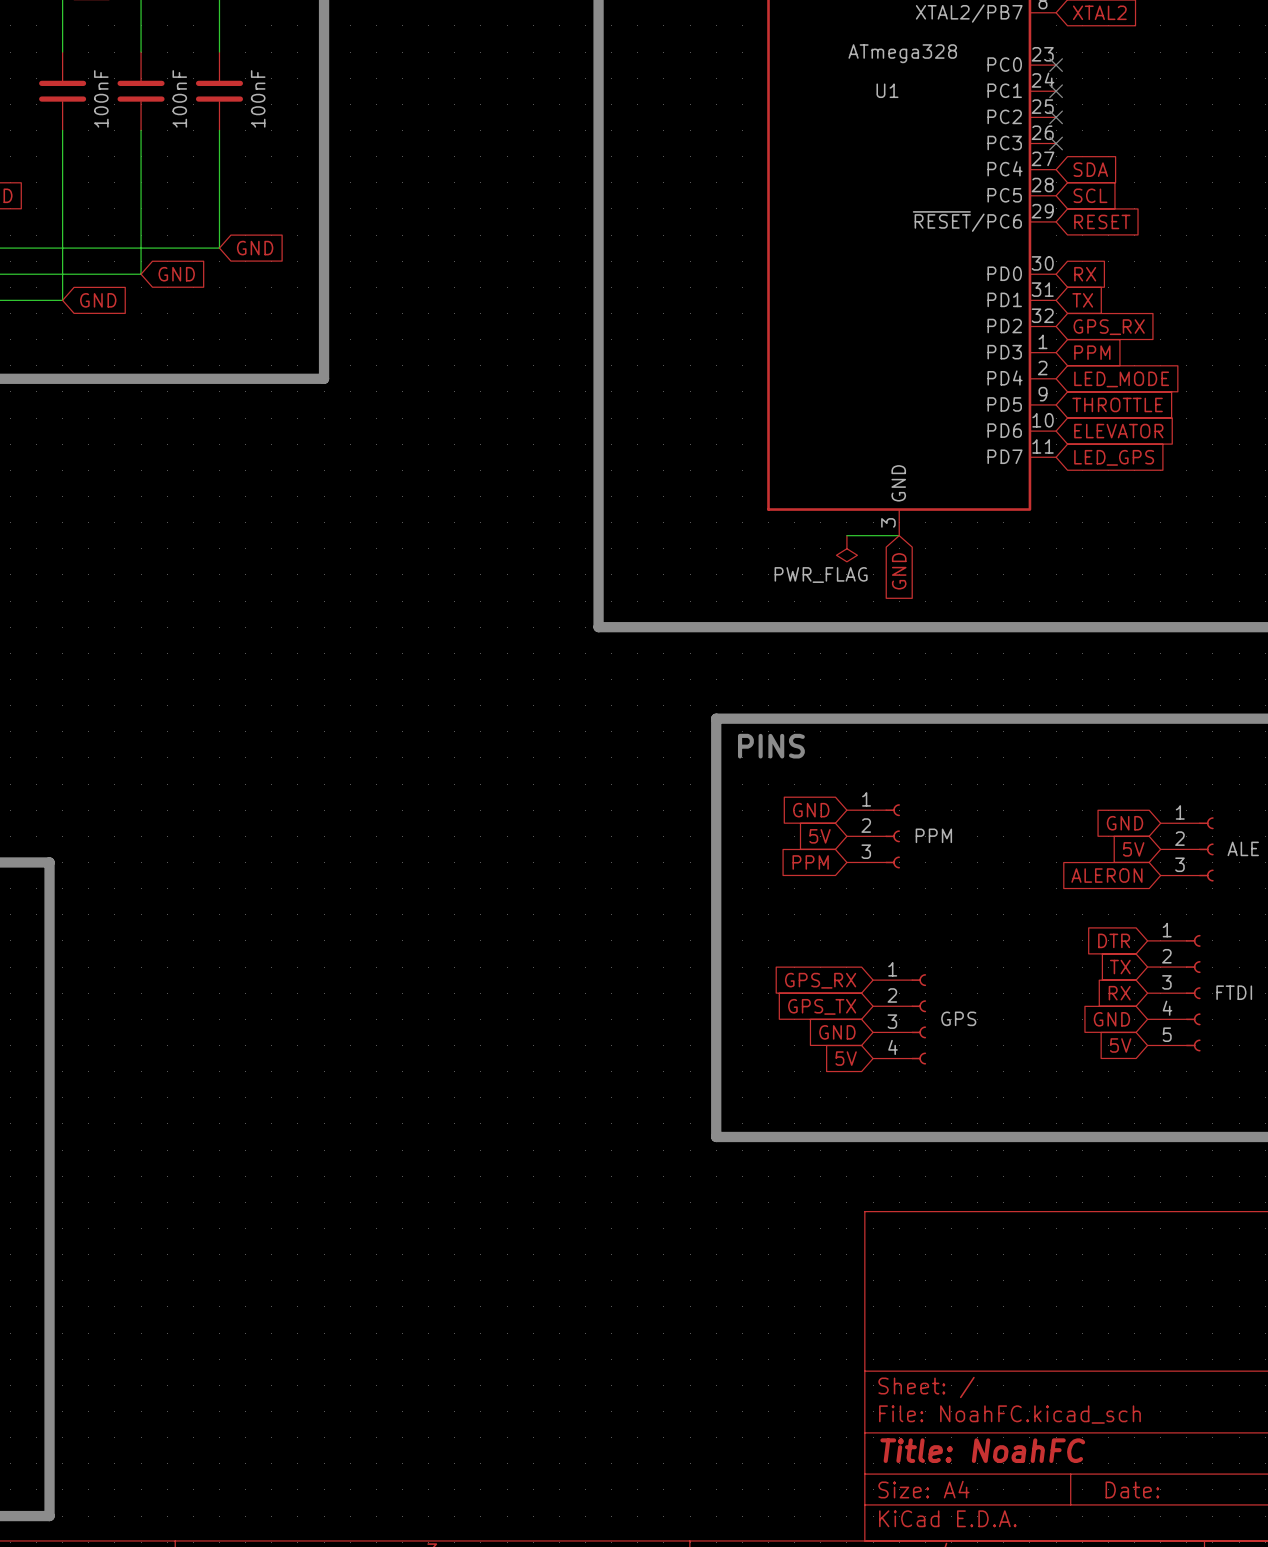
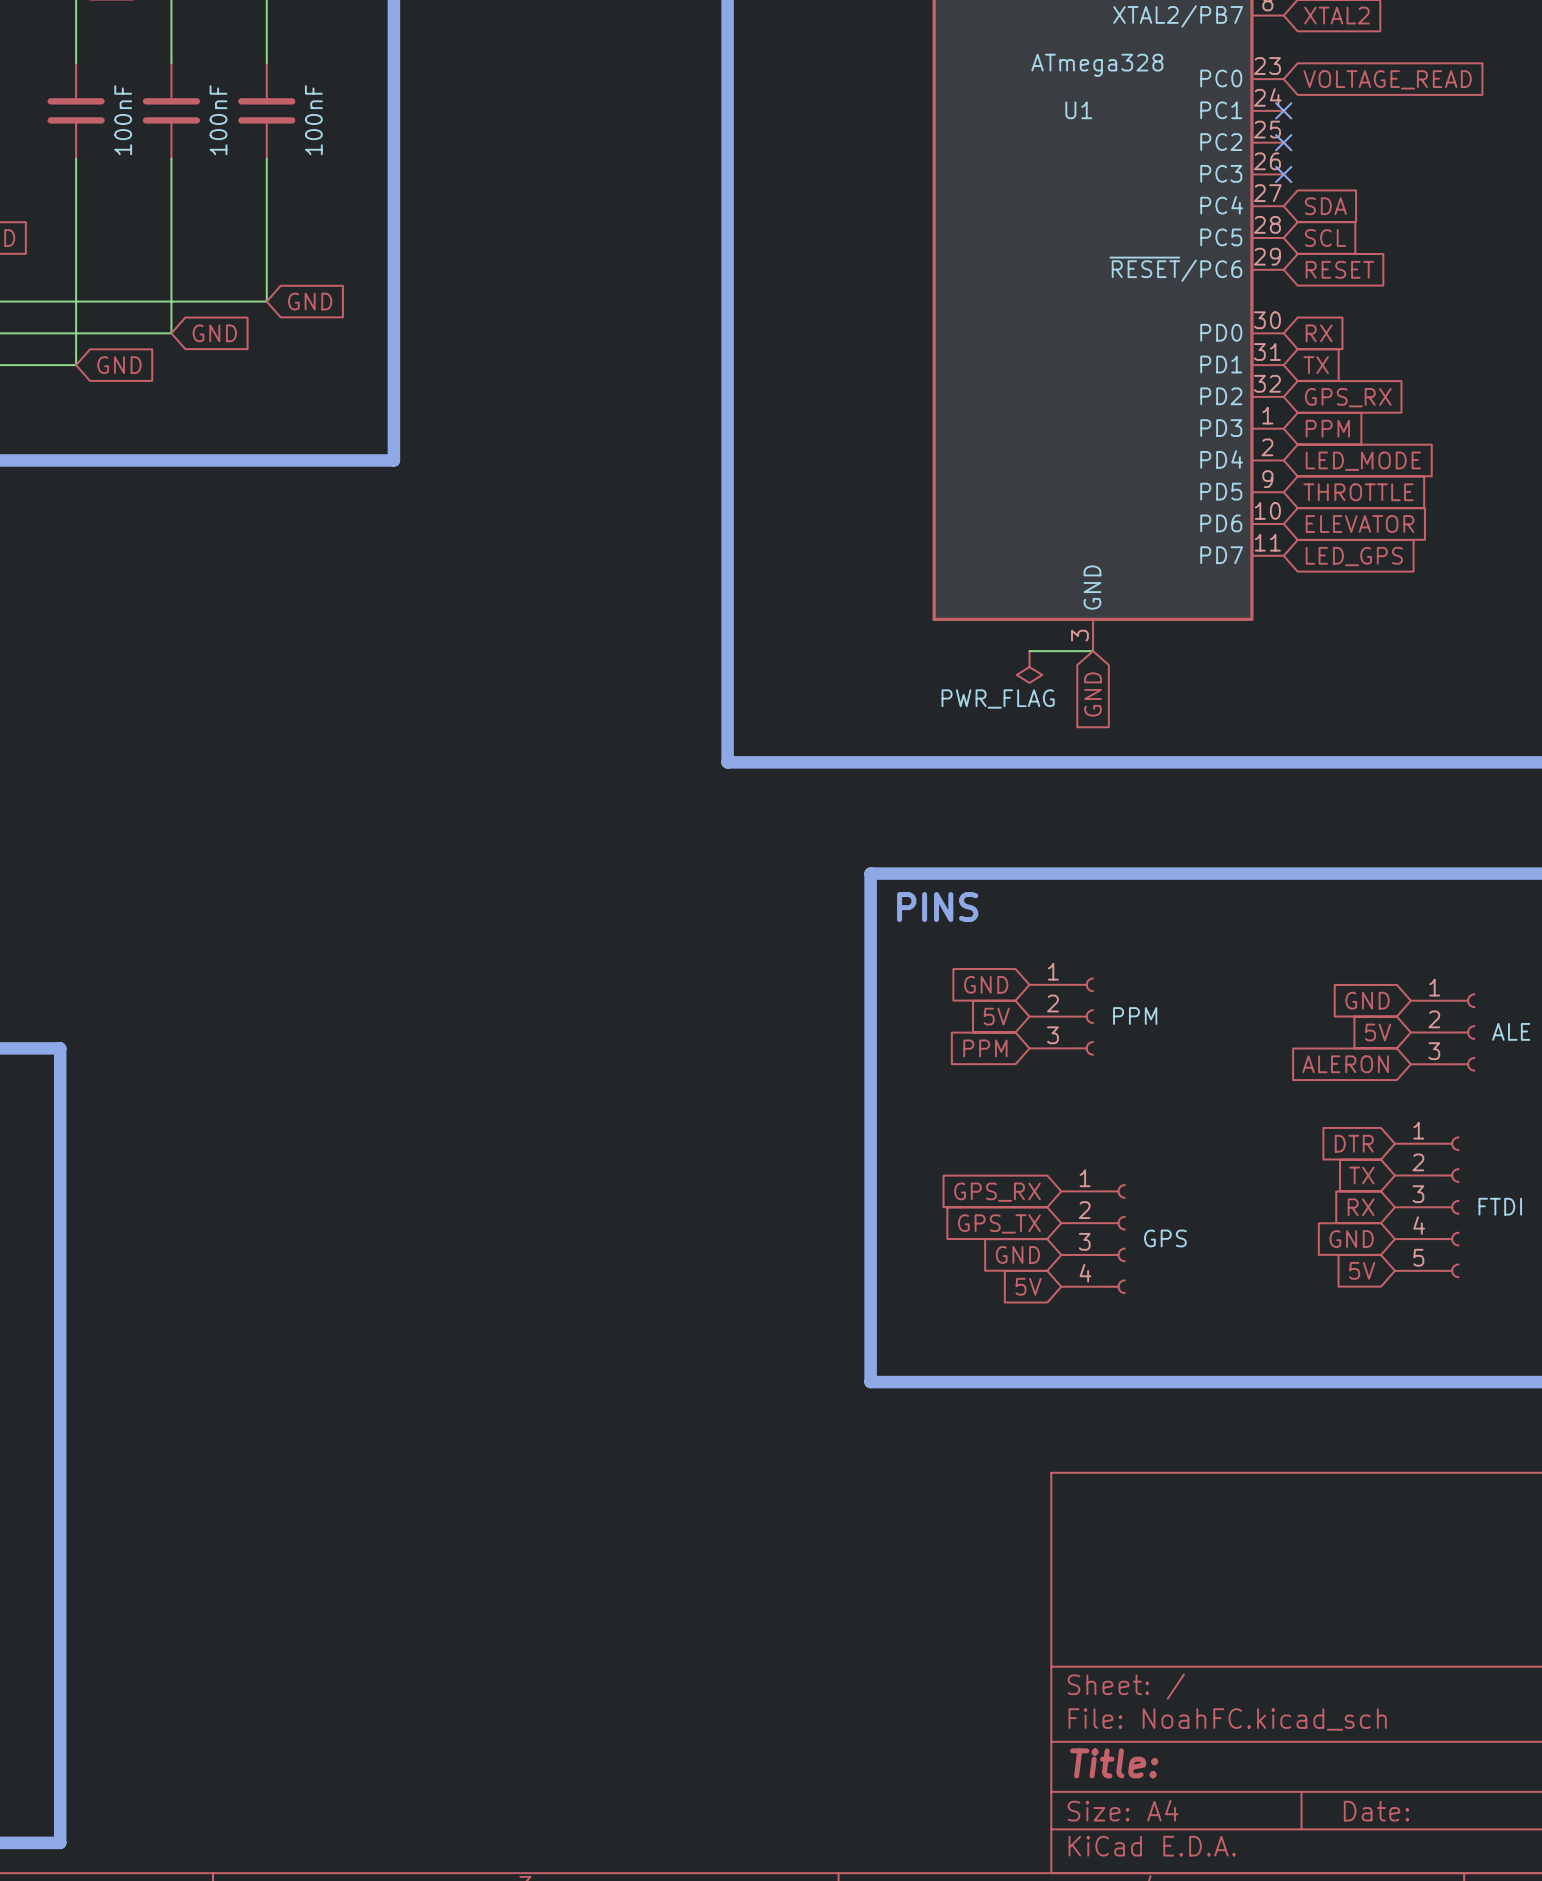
no-connect mark: (1056, 65) -> none
global label: none -> VOLTAGE_READ (1387, 79)
title block: Title: NoahFC (982, 1450) -> Title: (1114, 1763)

